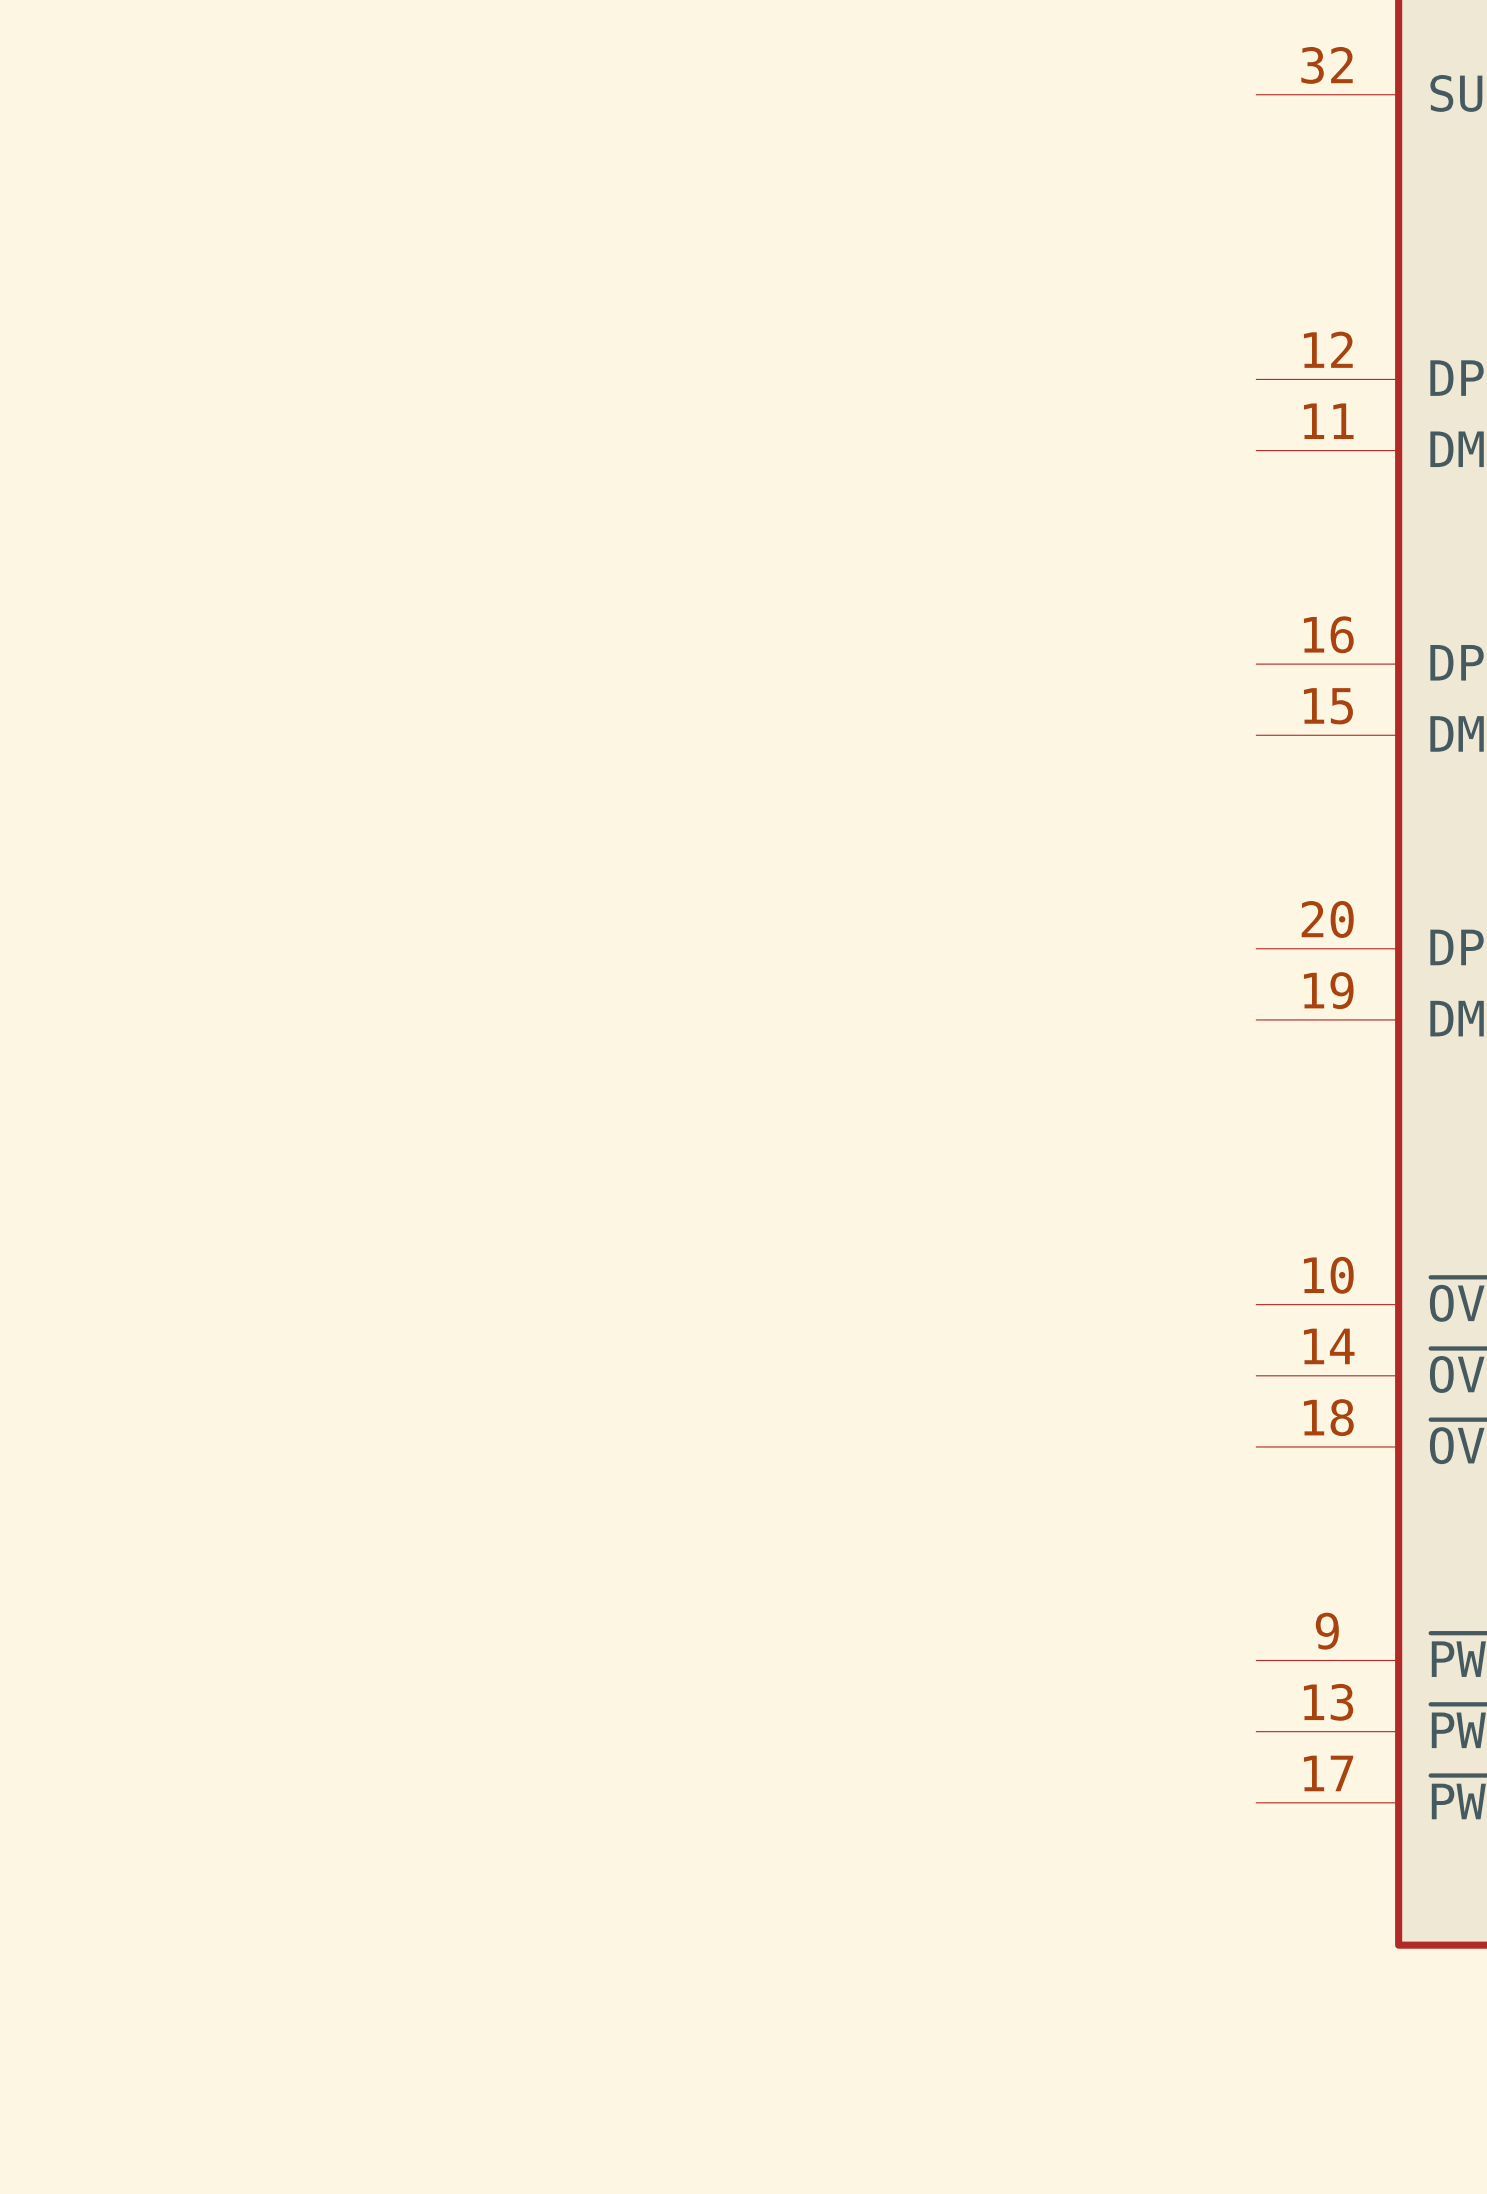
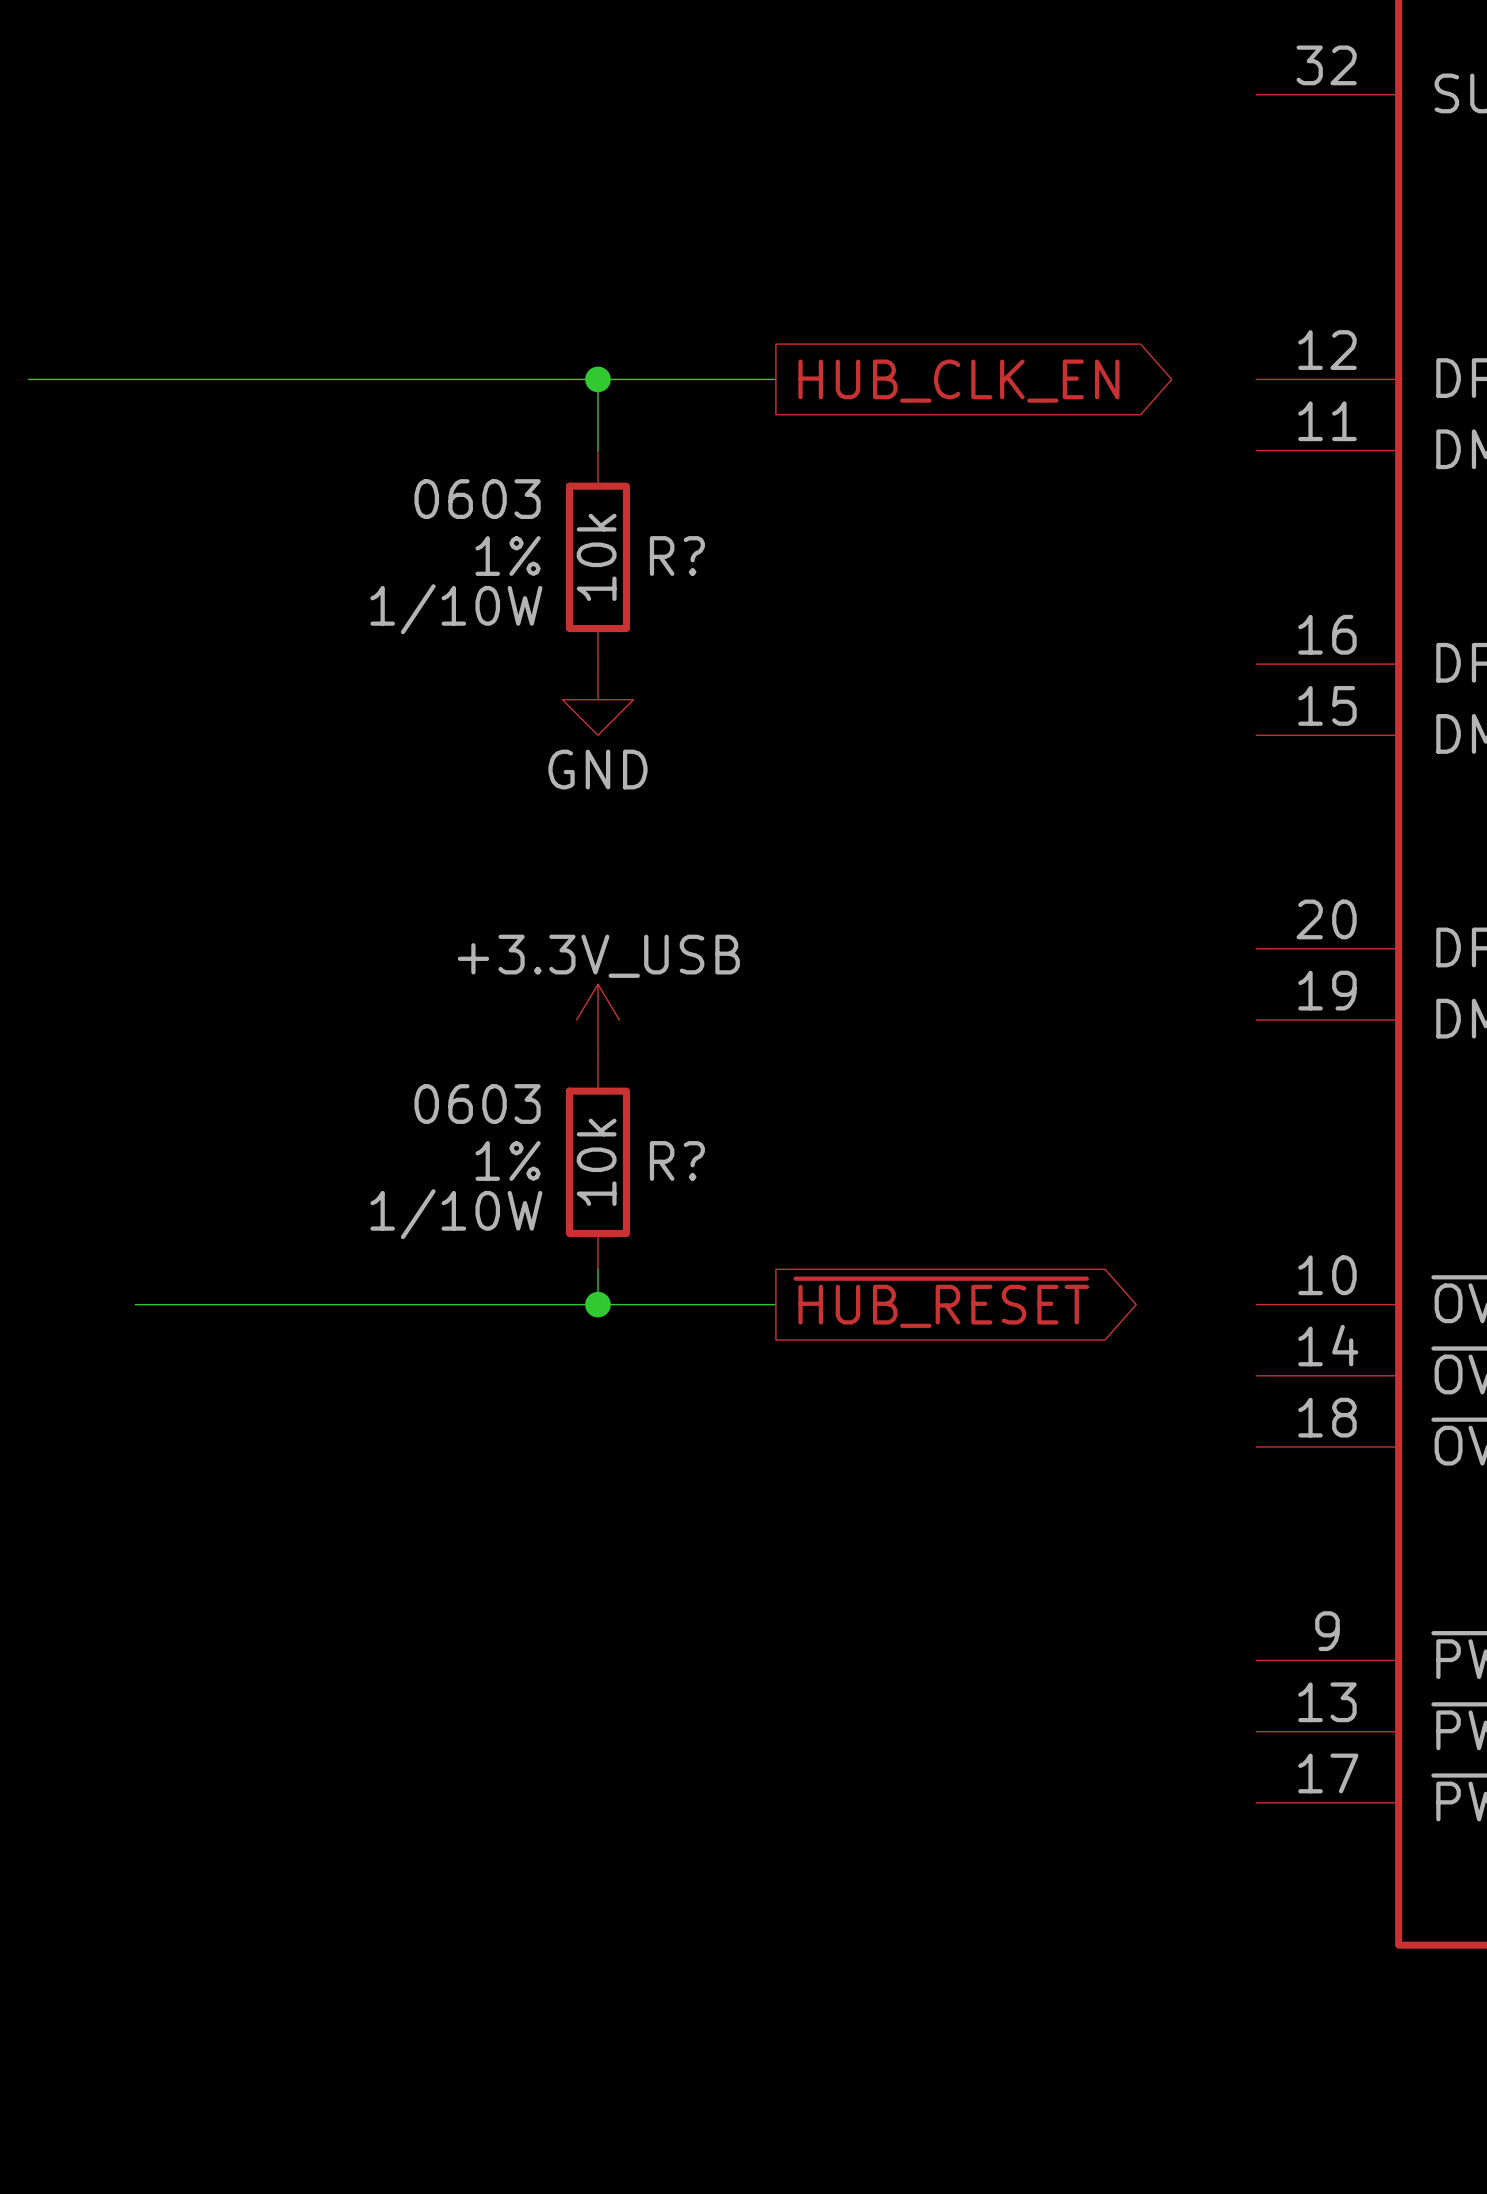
wire: none -> (28, 379) (775, 379)
wire: none -> (597, 379) (597, 450)
junction: none -> (597, 379)
global label: none -> HUB_CLK_EN (958, 381)
R?: none -> 10k (597, 557)
power symbol: none -> GND (597, 699)
power symbol: none -> +3.3V_USB (597, 1019)
R?: none -> 10k (597, 1162)
wire: none -> (597, 1269) (597, 1304)
wire: none -> (135, 1304) (775, 1304)
junction: none -> (597, 1304)
global label: none -> ~{HUB_RESET} (941, 1302)

